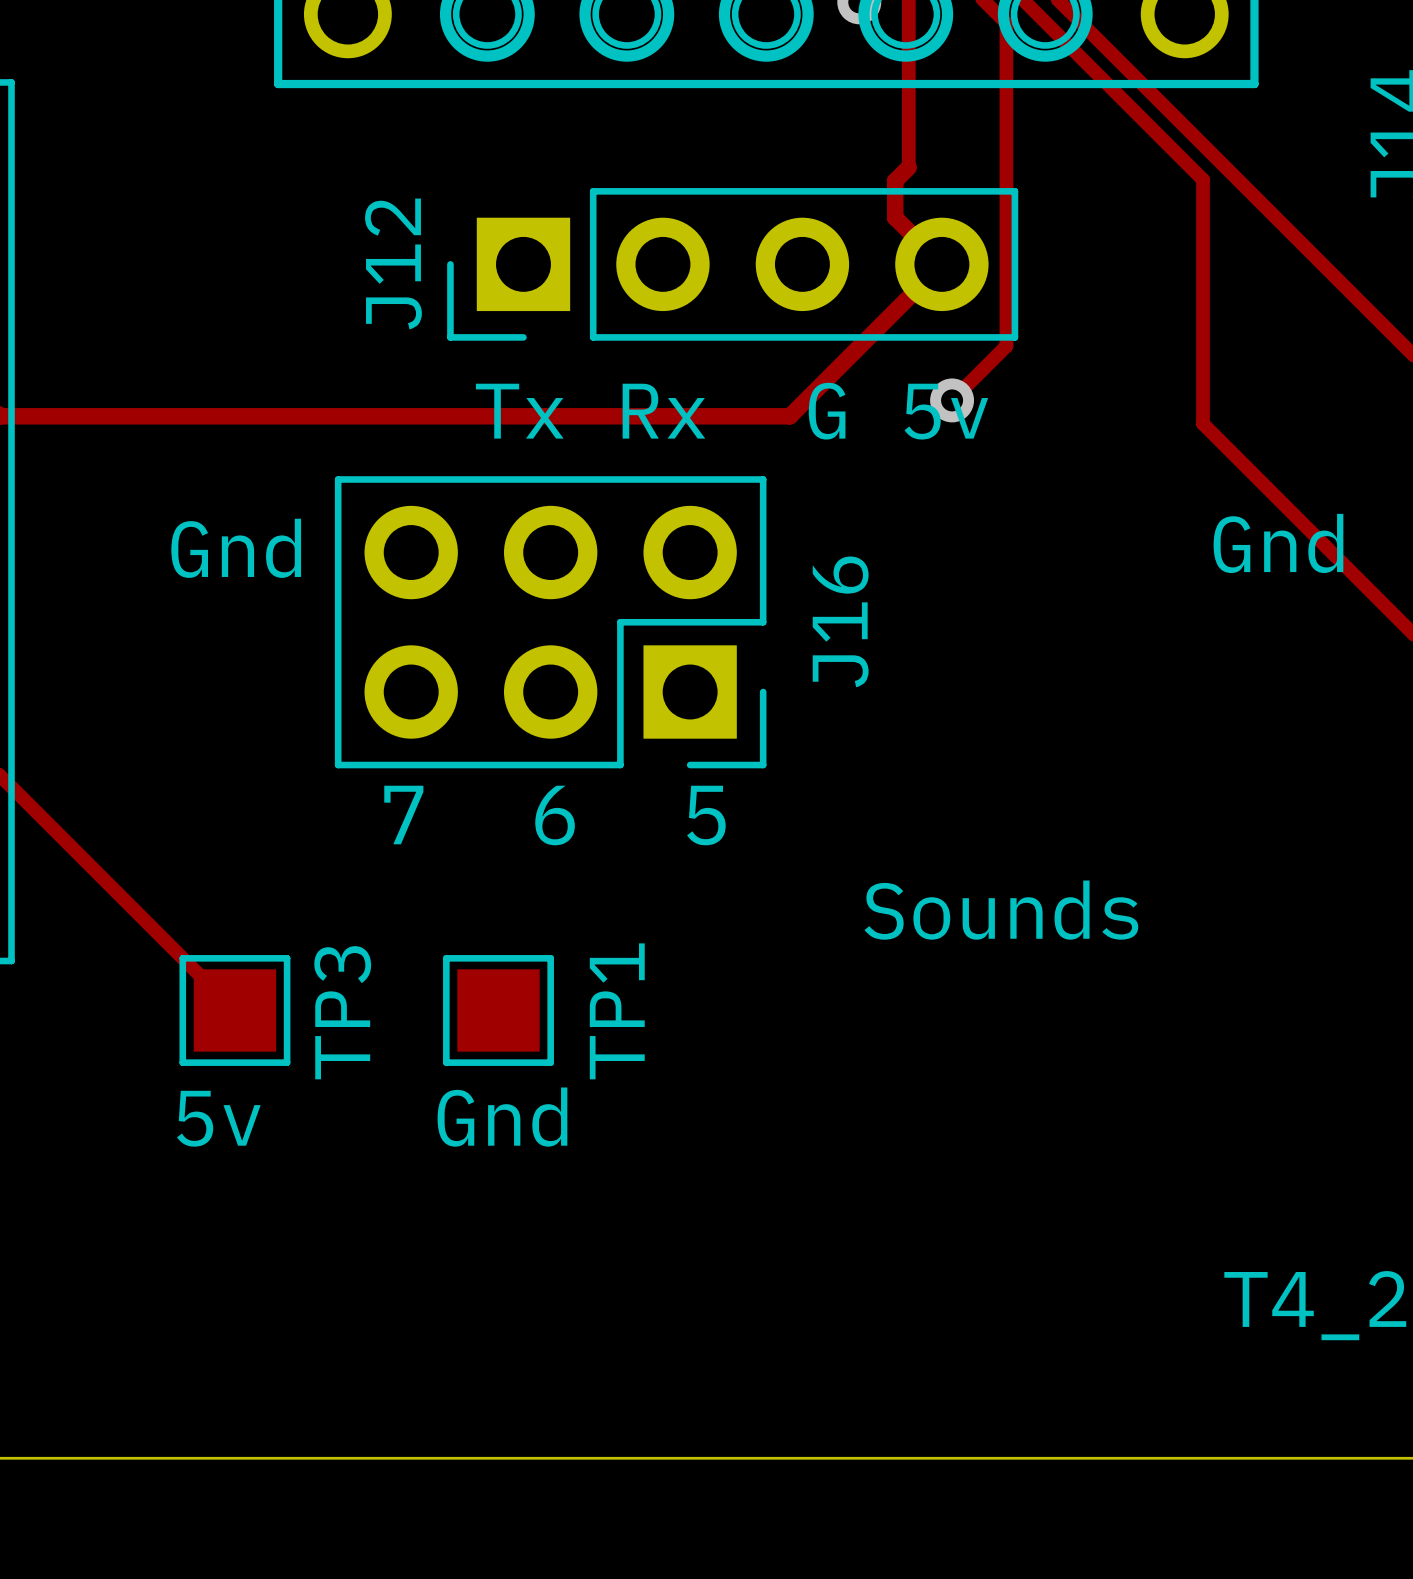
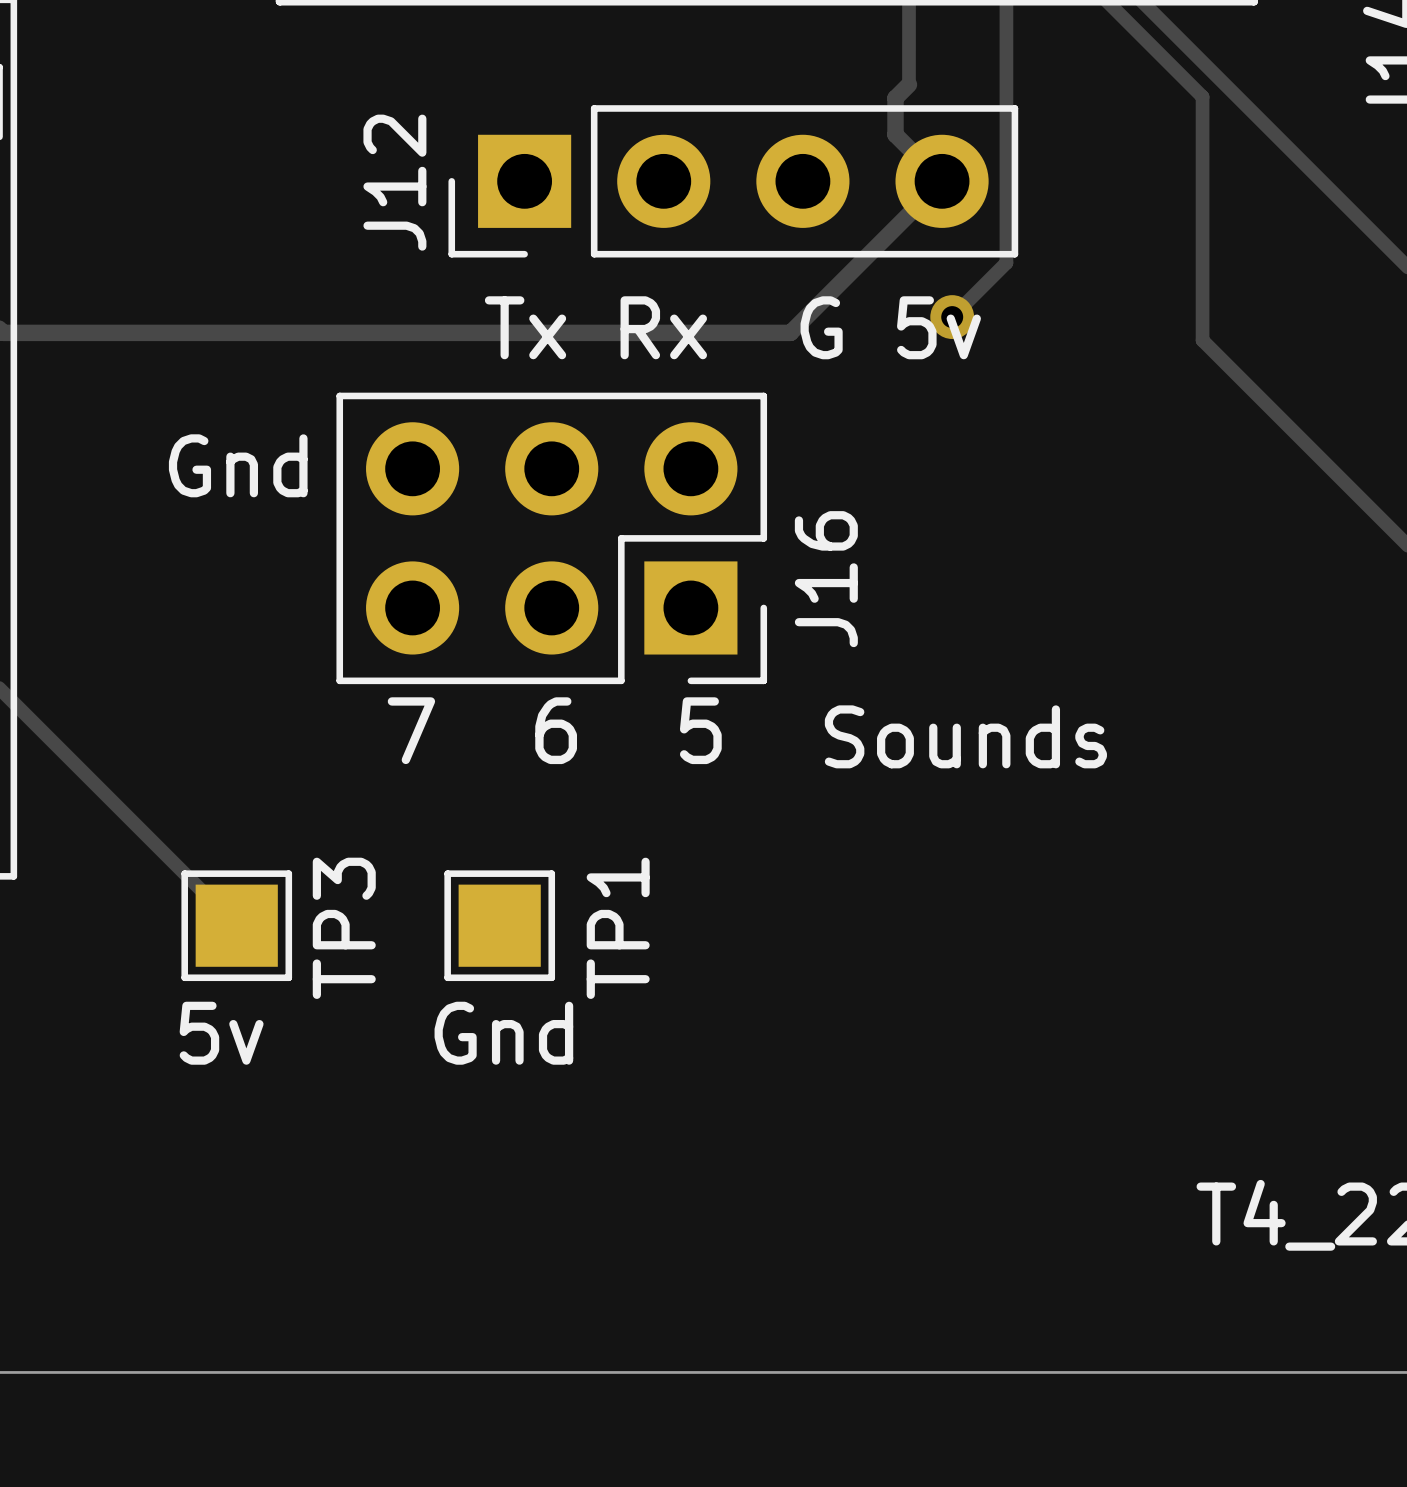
text: Gnd (1278, 543) -> none
J16 name position: J16 (840, 621) -> J16 (826, 579)
text position: Sounds (1001, 910) -> Sounds (965, 736)

